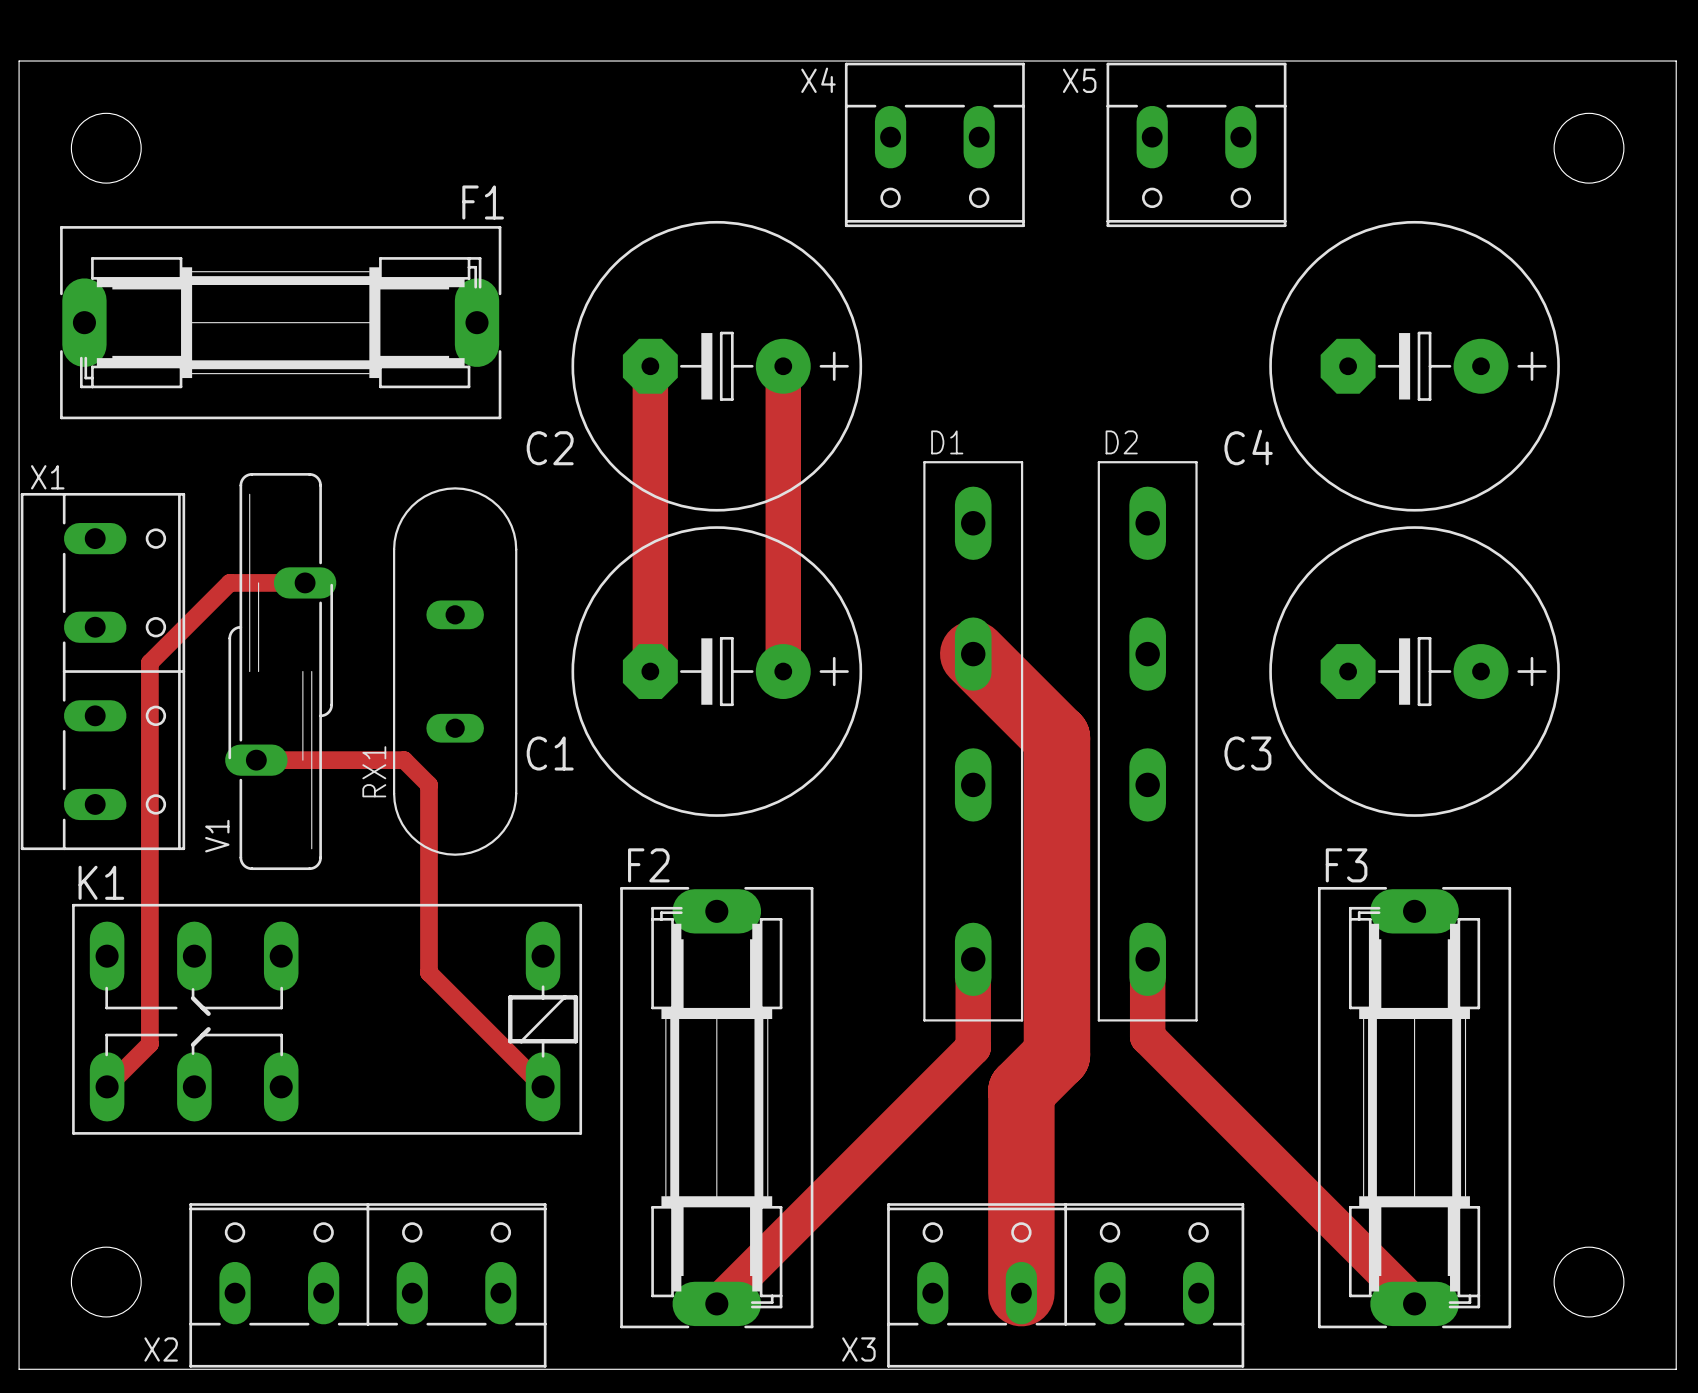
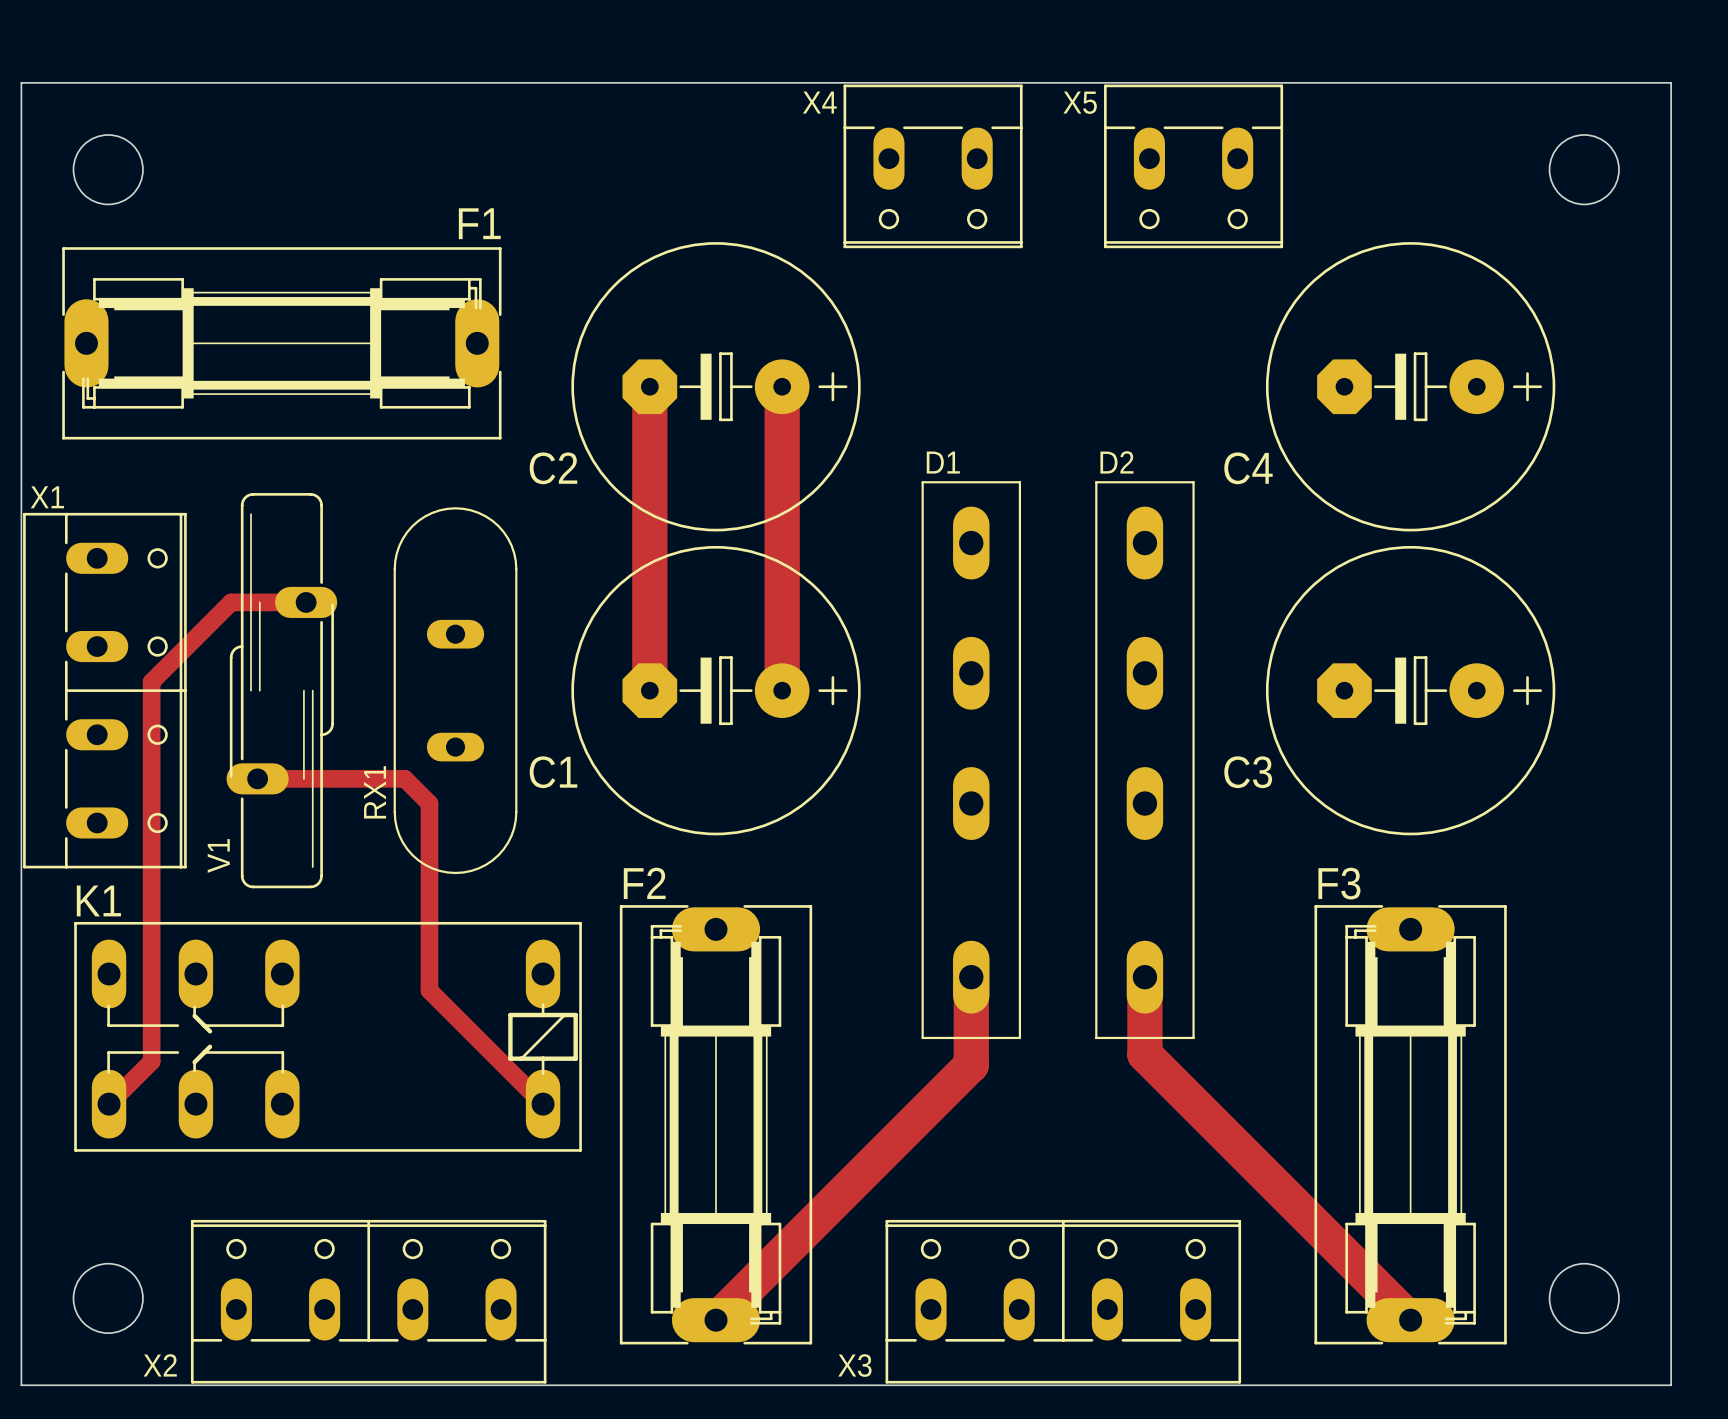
track: (973, 654) (1056, 737) (1056, 1055) (1021, 1090) (1021, 1293) -> none

